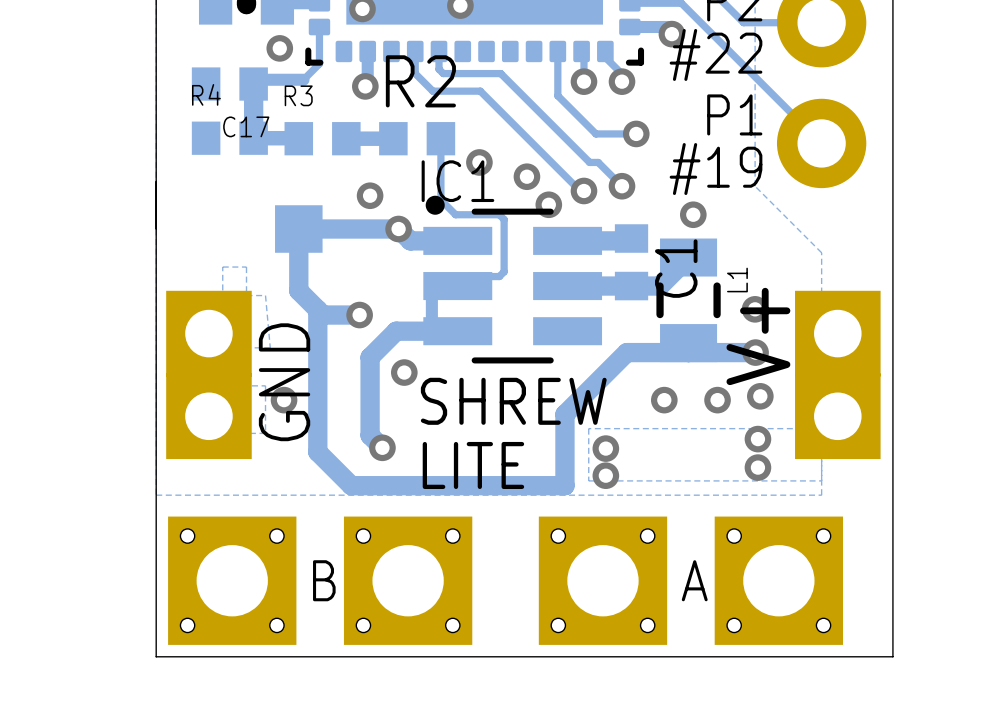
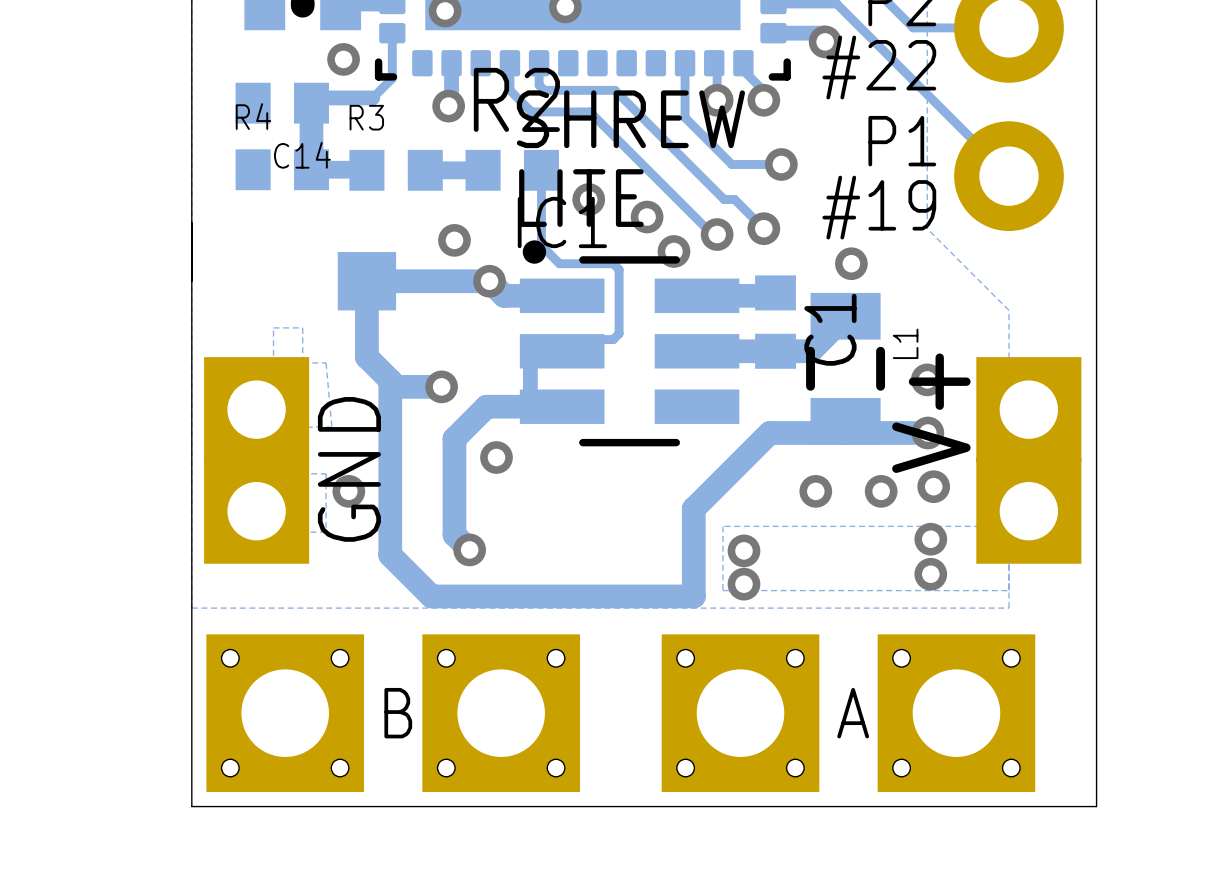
C17 name: C17 (246, 126) -> C14 (302, 155)
text position: SHREW (513, 401) -> SHREW (630, 119)
text position: LITE (473, 465) -> LITE (581, 198)

